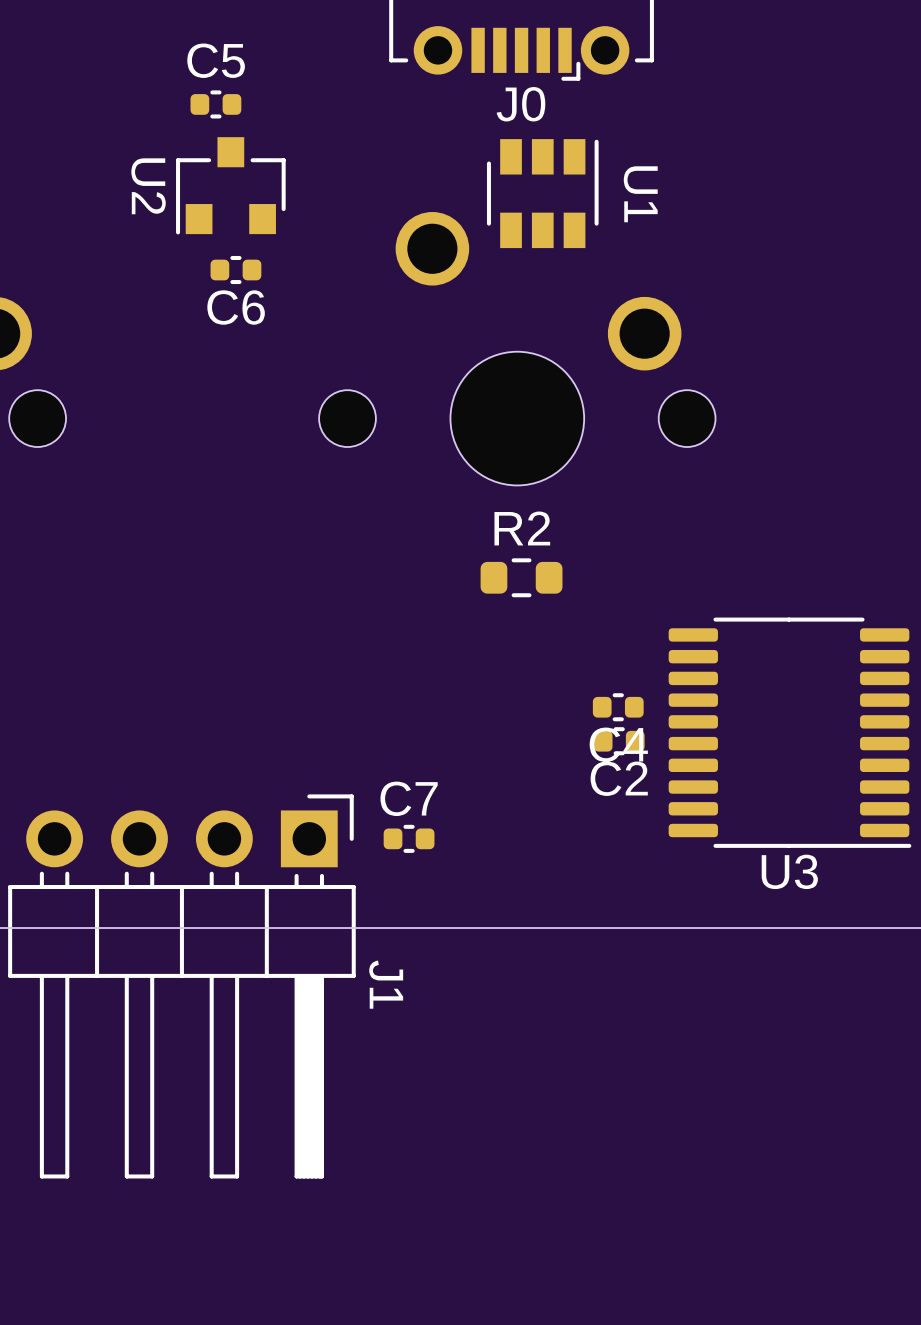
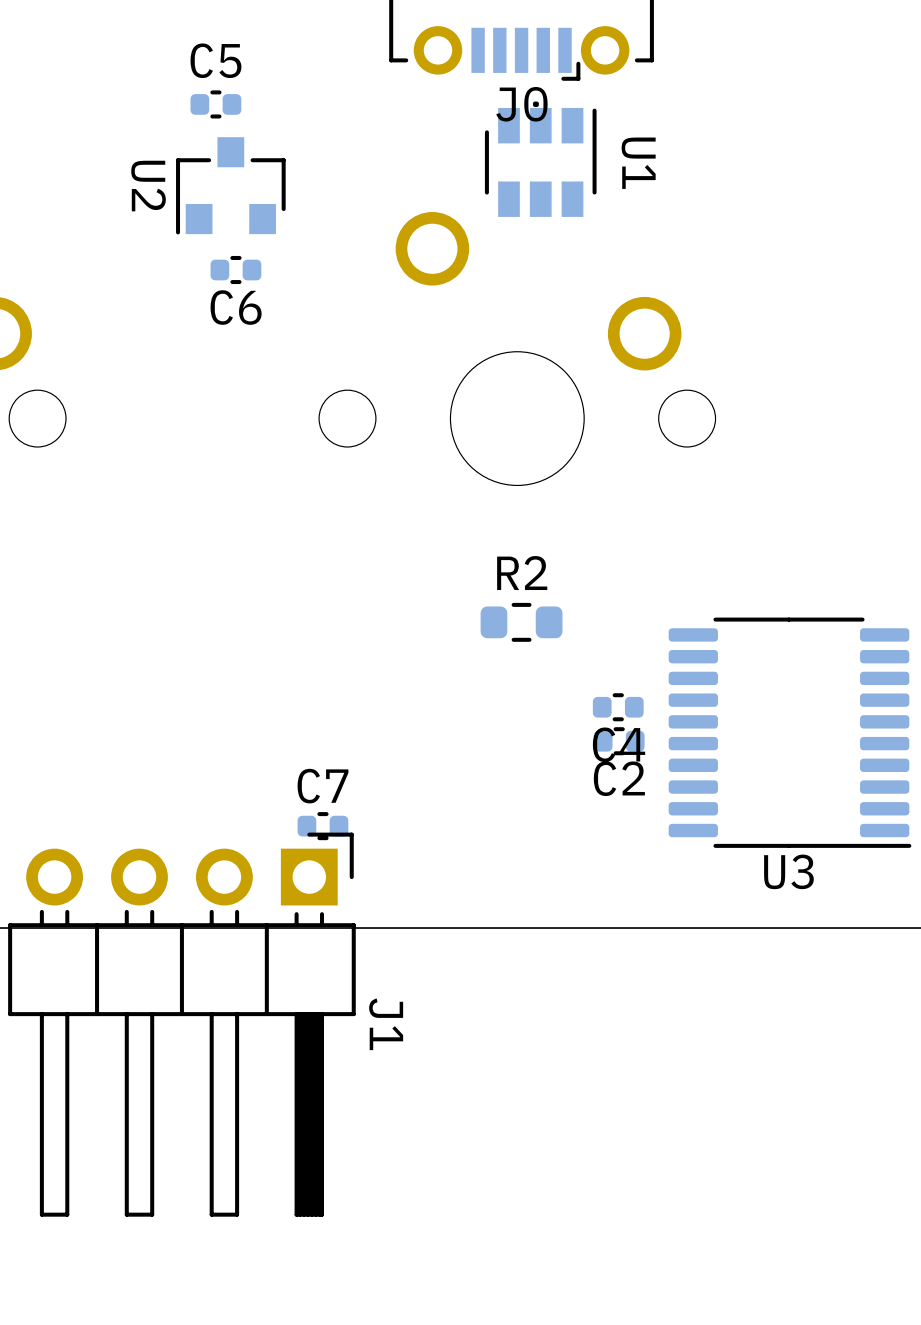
U1 position: (542, 193) -> (540, 162)
R2 position: (521, 577) -> (521, 622)
C7 position: (409, 838) -> (322, 826)
J1 position: (181, 986) -> (181, 1024)

